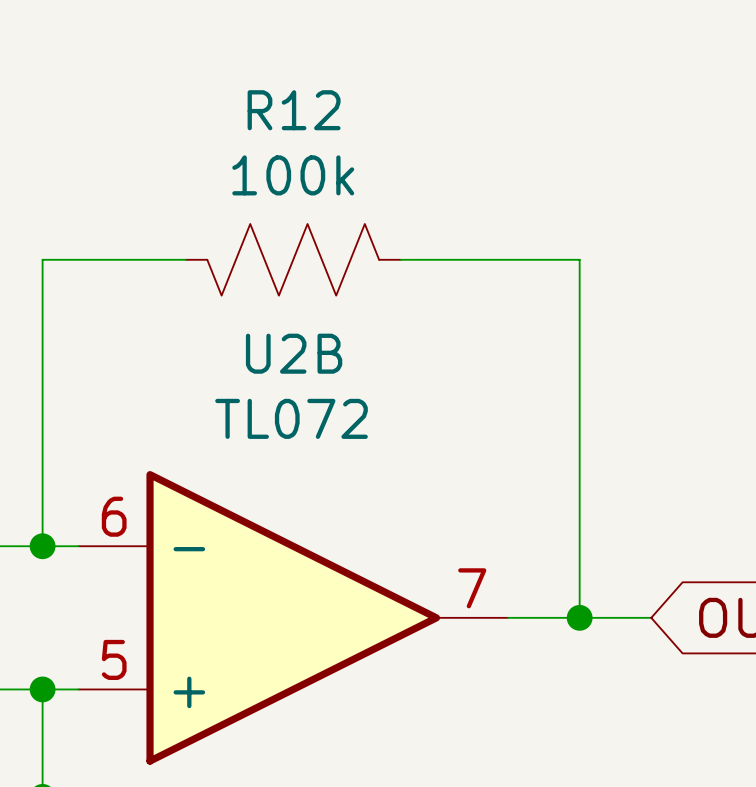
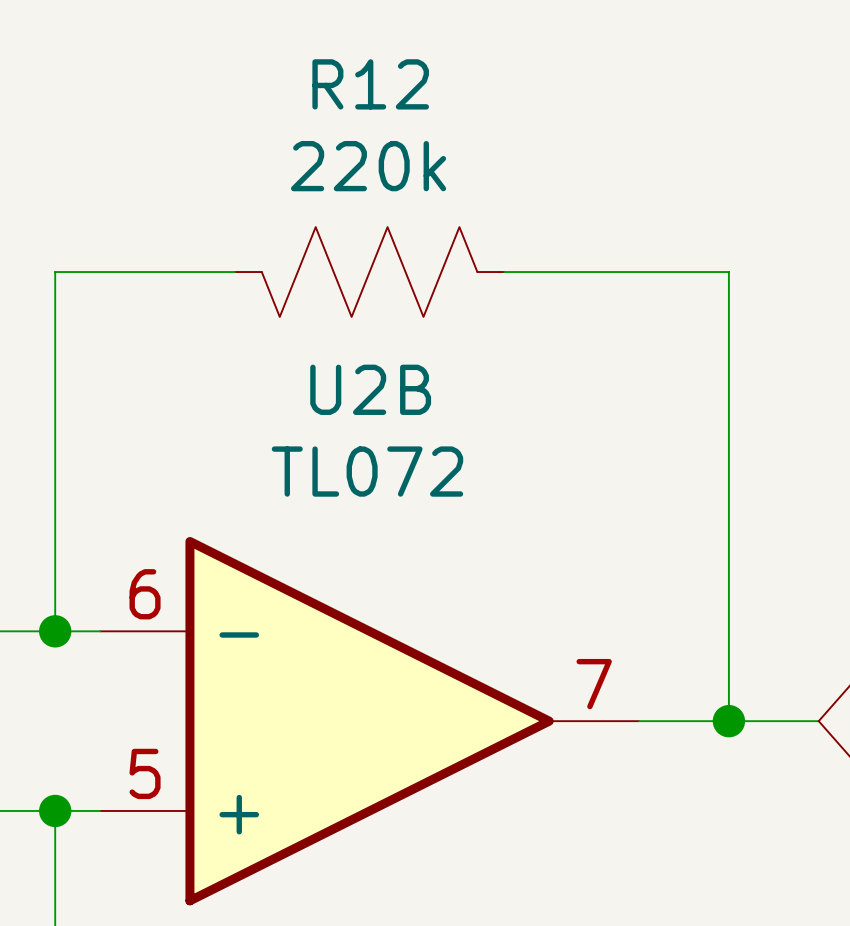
R12 value: 100k (293, 175) -> 220k (368, 166)

